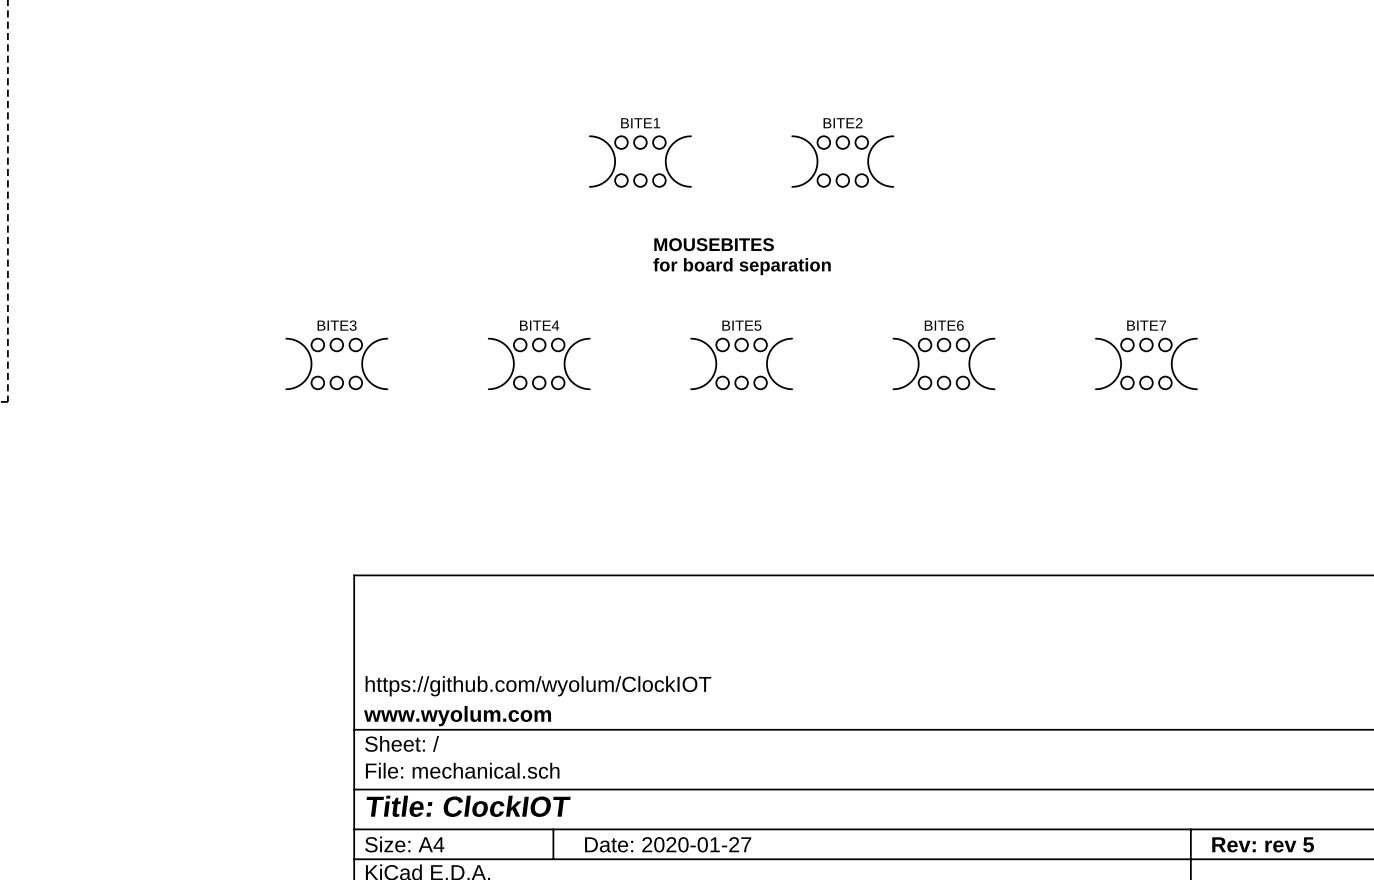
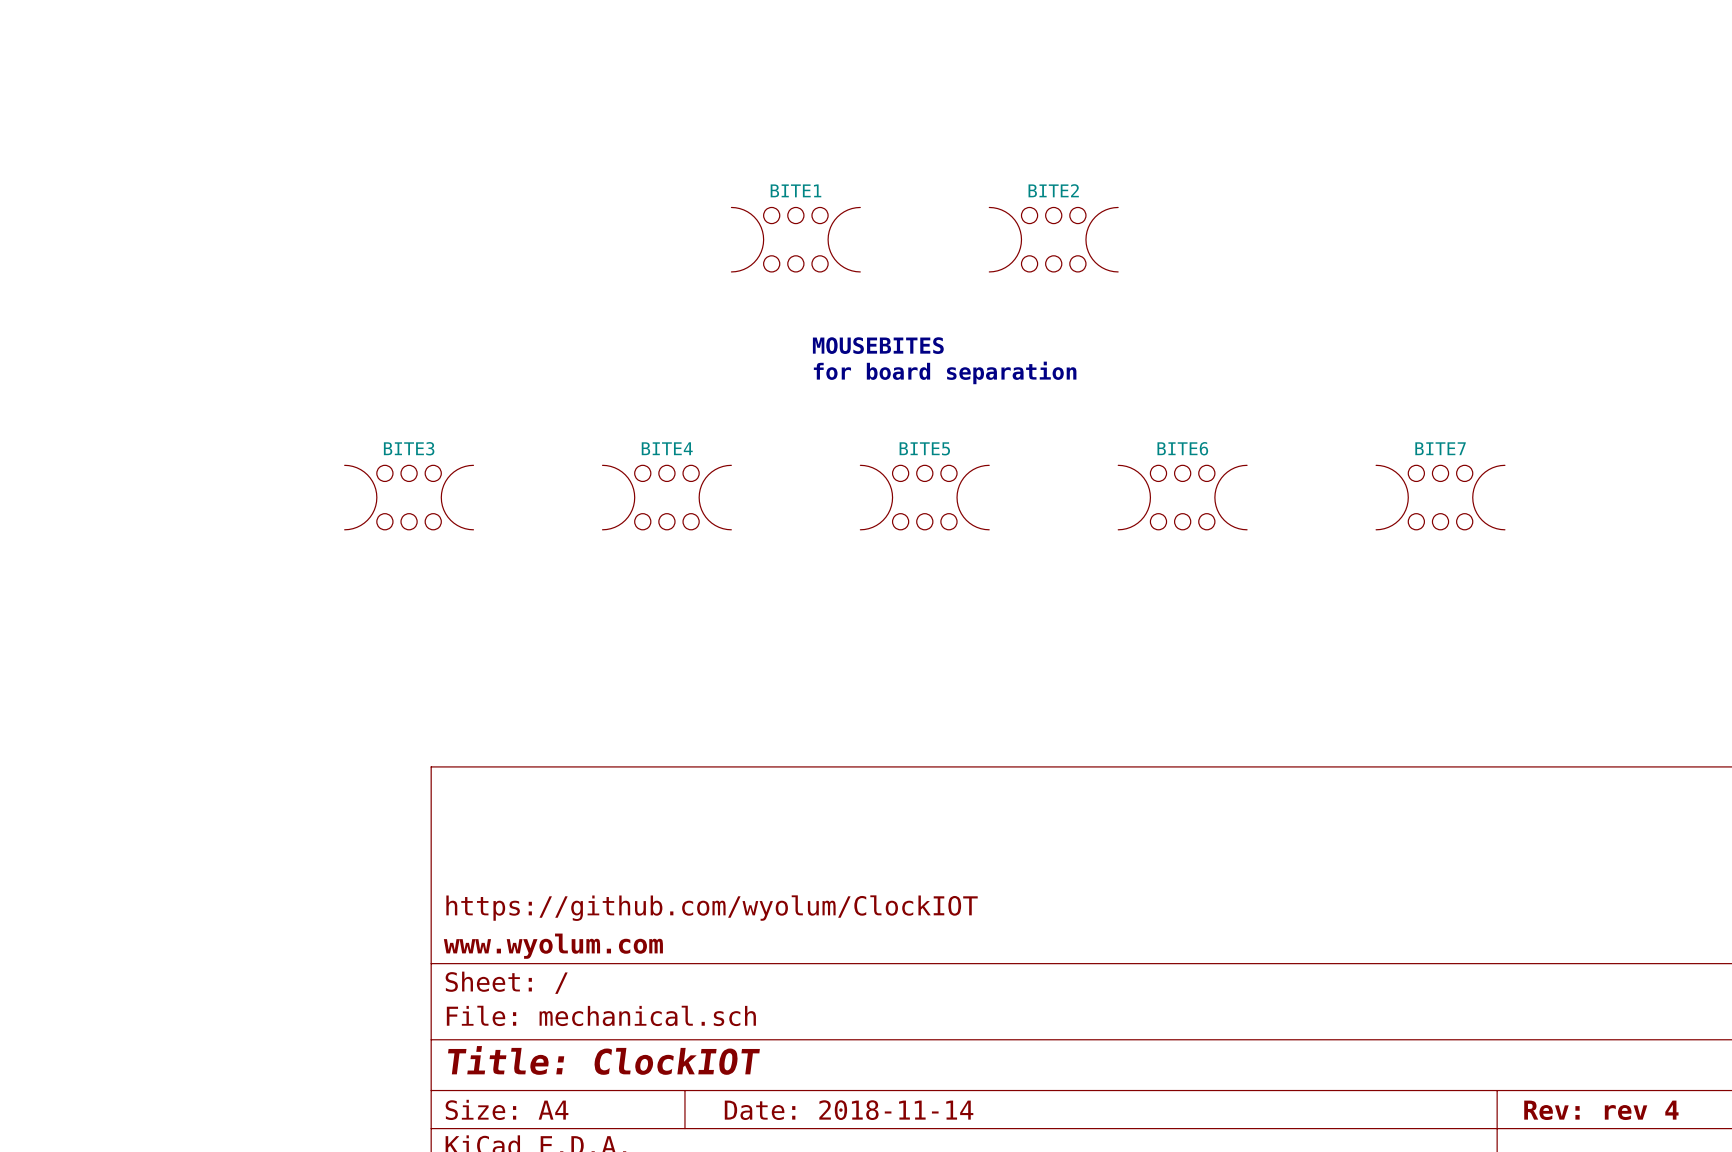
title block: Date: 2020-01-27 (668, 844) -> Date: 2018-11-14 (849, 1110)
title block: Rev: rev 5 (1263, 844) -> Rev: rev 4 (1601, 1110)

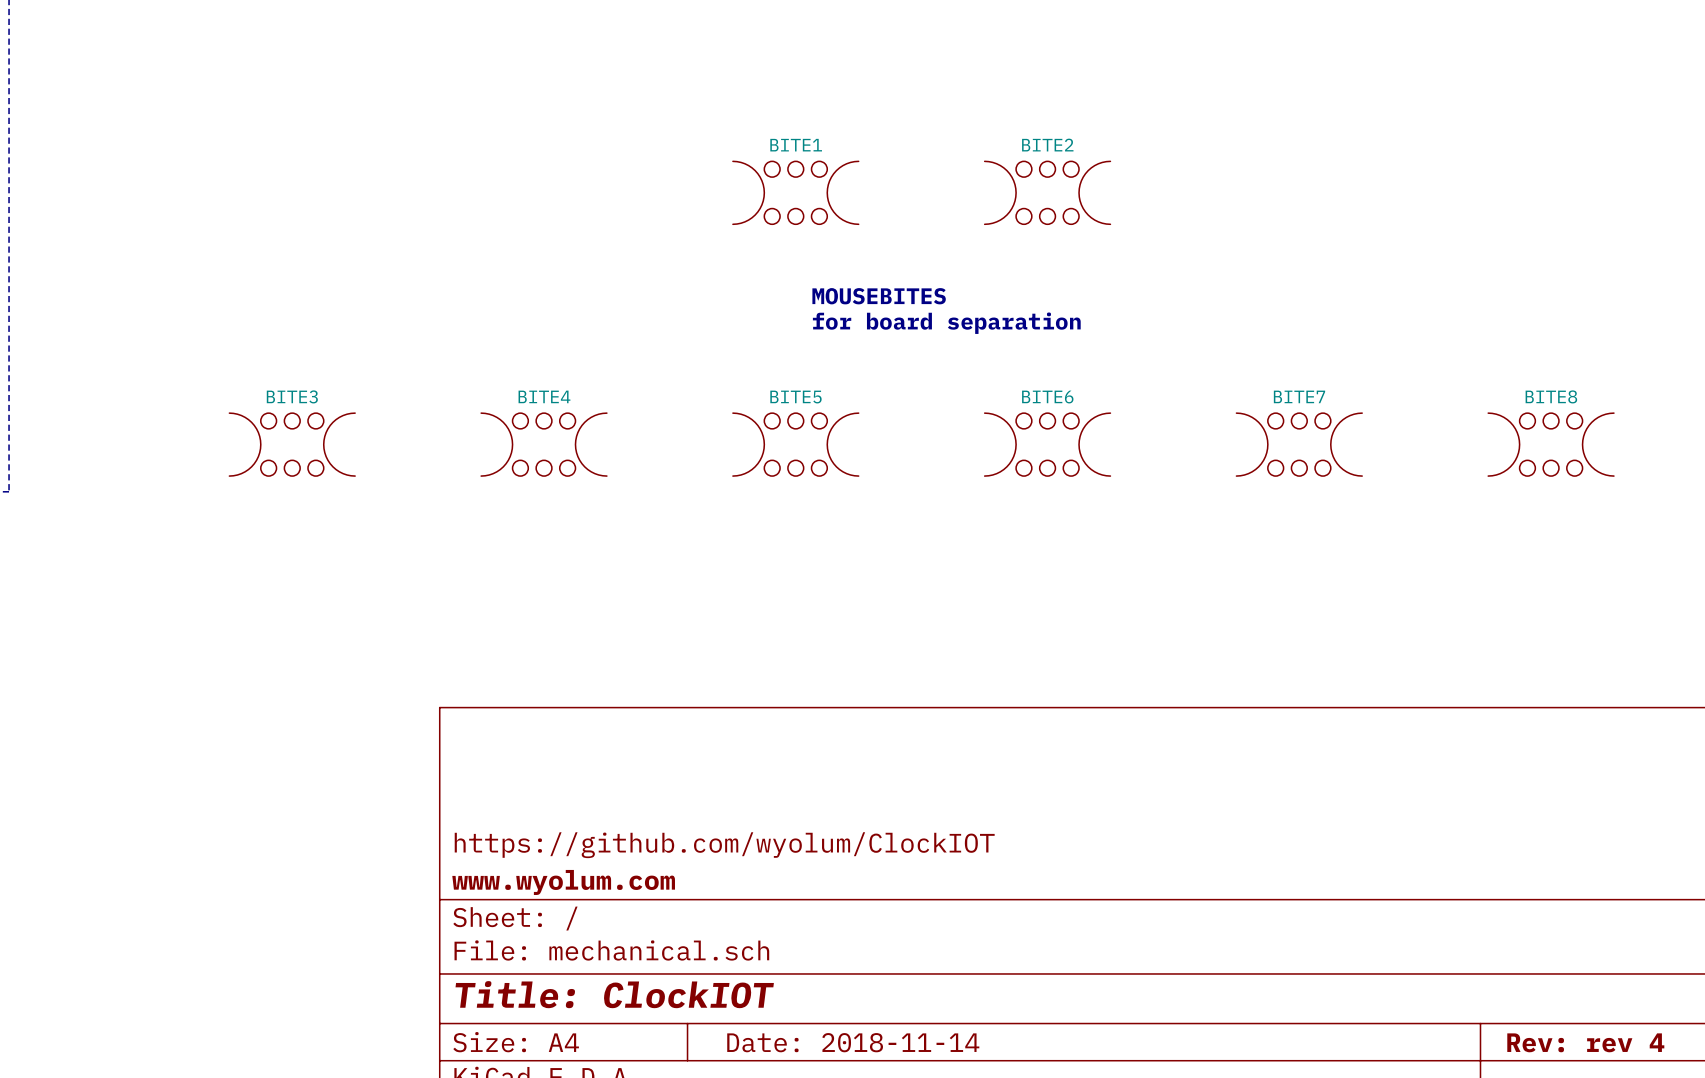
BITE3 position: (409, 497) -> (292, 444)
BITE4 position: (666, 497) -> (544, 444)
BITE5 position: (924, 497) -> (795, 444)
BITE6 position: (1182, 497) -> (1047, 444)
BITE7 position: (1440, 497) -> (1299, 444)
BITE8: none -> (1551, 444)

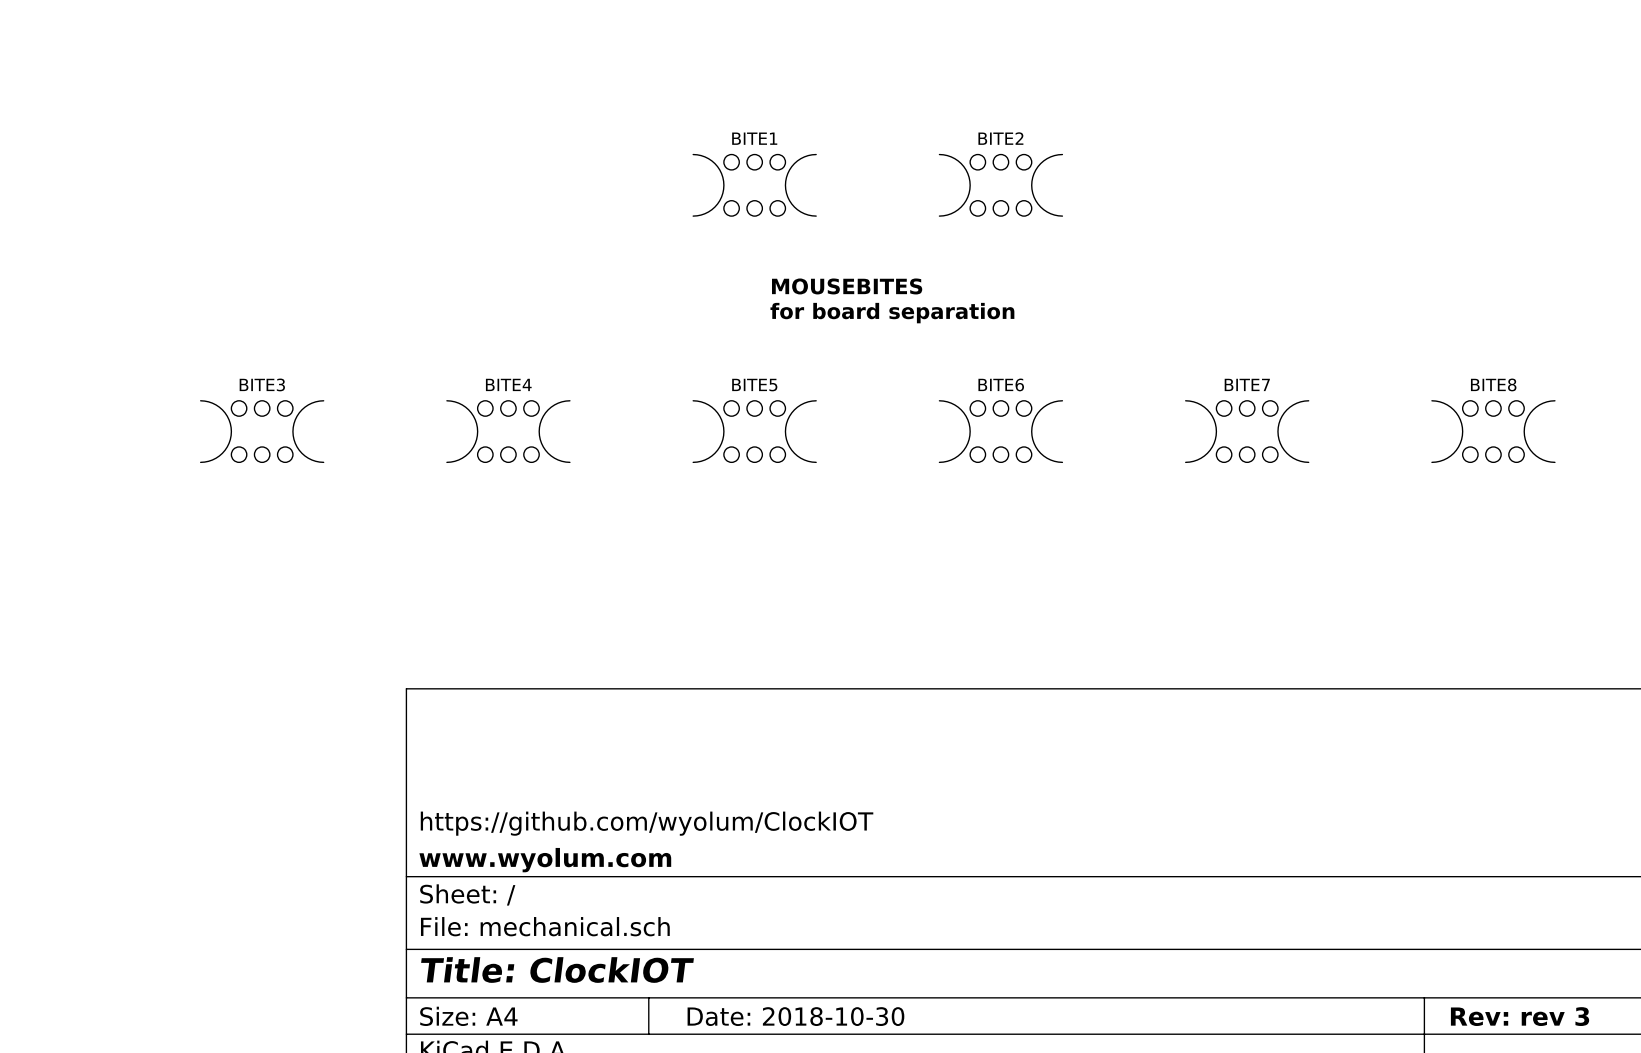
title block: Date: 2018-11-14 (853, 1042) -> Date: 2018-10-30 (795, 1016)
title block: Rev: rev 4 (1585, 1042) -> Rev: rev 3 (1520, 1016)

